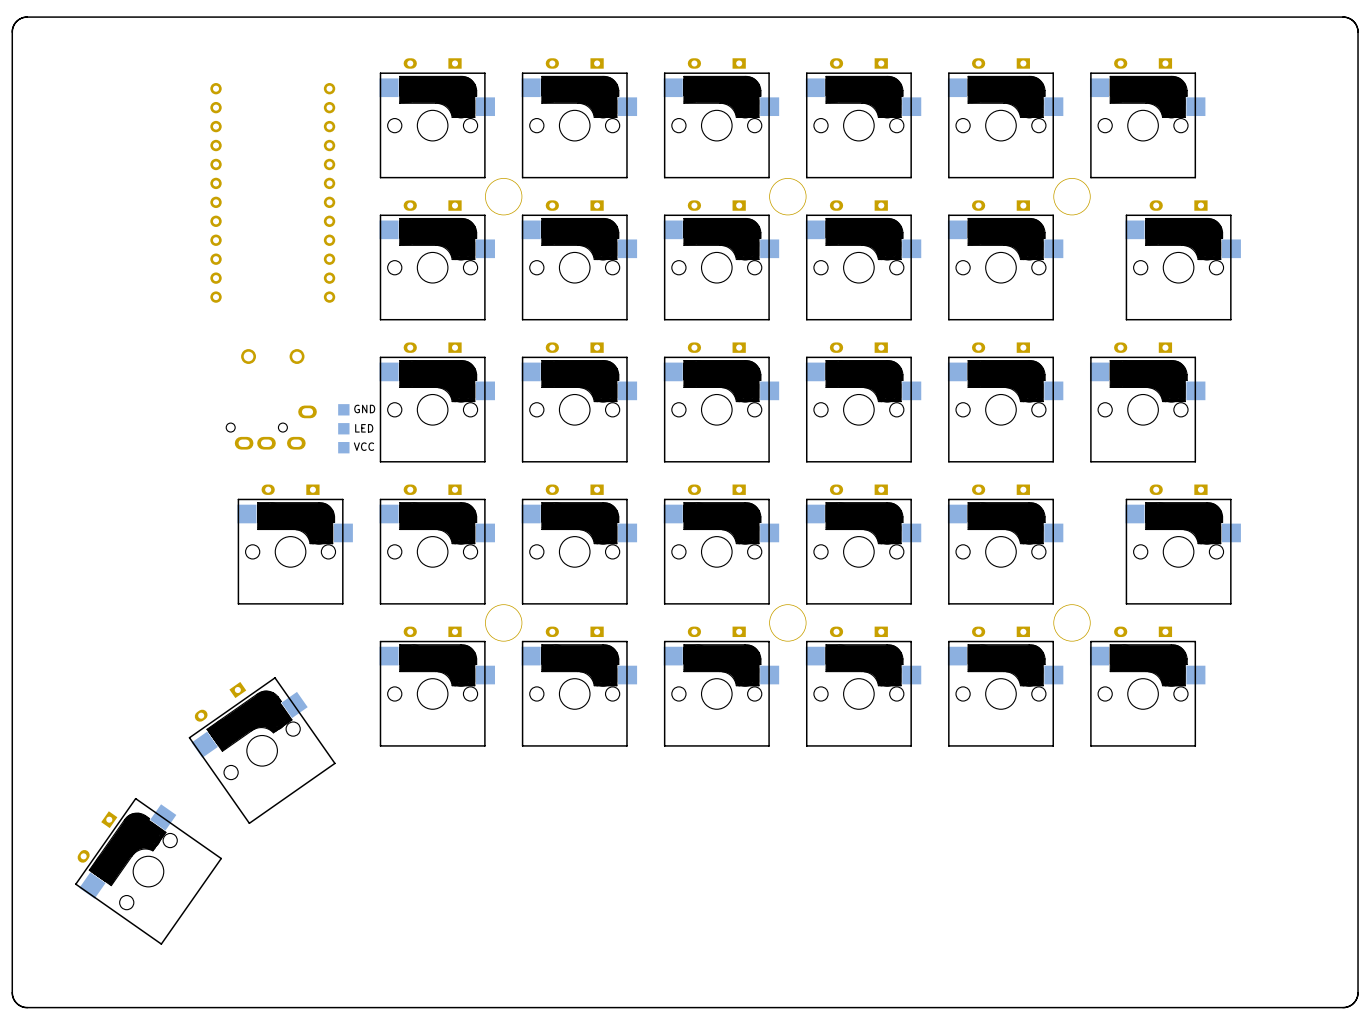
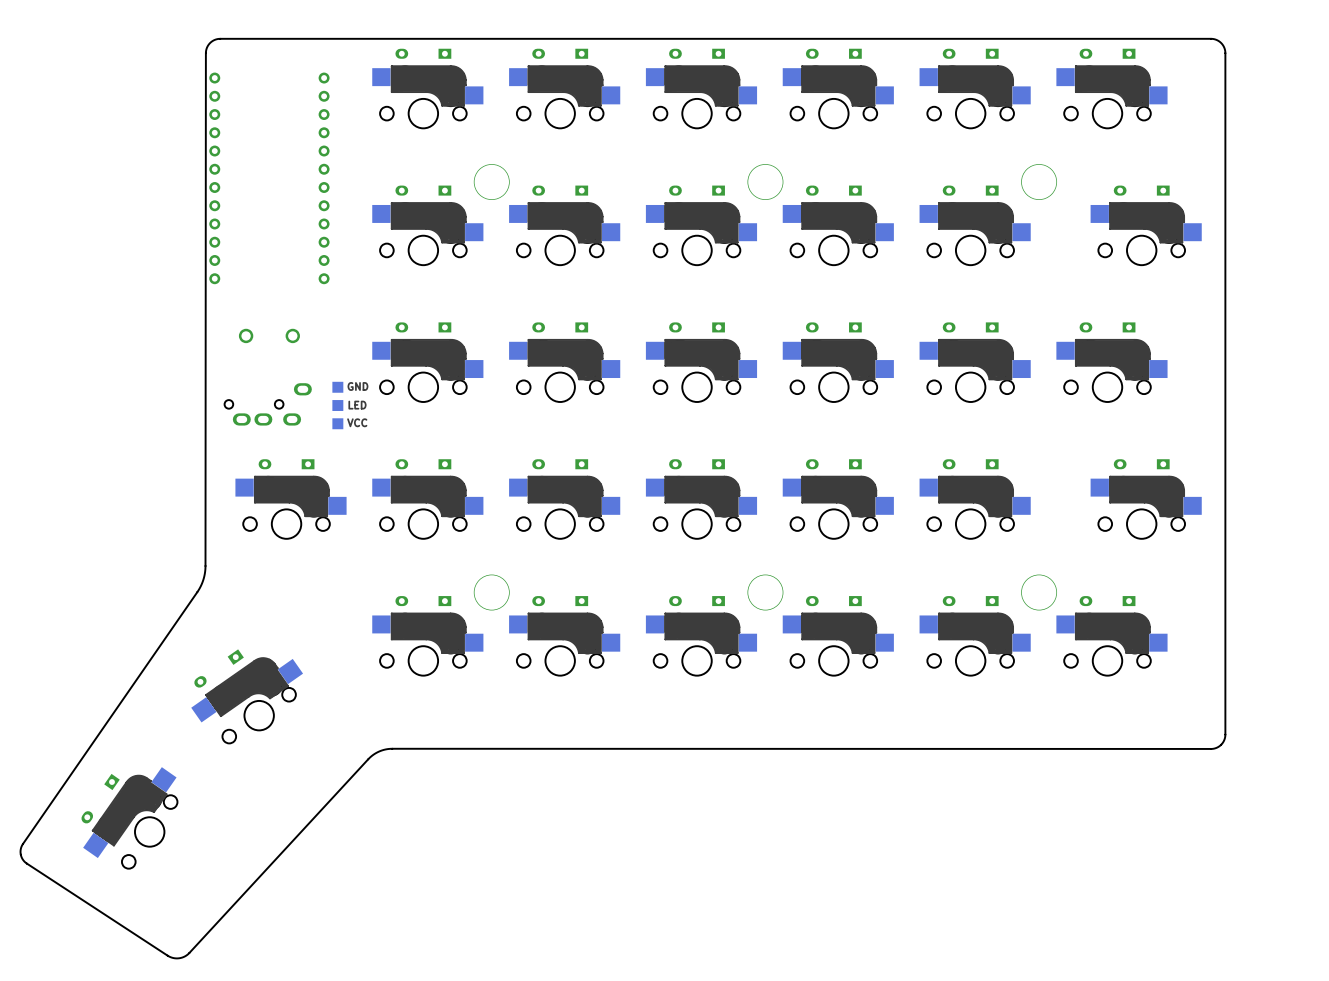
board edge: (1344, 17) (1353, 21) (1358, 32) (1358, 992) (1356, 999) (1351, 1004) (1343, 1007) (27, 1007) (20, 1005) (15, 1001) (12, 992) (12, 32) (13, 25) (18, 19) (27, 17) (1344, 17) -> (1211, 38) (1221, 43) (1225, 53) (1225, 734) (1223, 741) (1218, 746) (1211, 748) (385, 749) (369, 758) (189, 952) (179, 958) (167, 955) (22, 859) (20, 852) (22, 844) (197, 592) (204, 576) (205, 53) (207, 46) (212, 41) (220, 38) (1211, 38)
board edge: (484, 73) (484, 177) (380, 177) (380, 73) (484, 73) -> none
board edge: (626, 73) (626, 177) (522, 177) (522, 73) (626, 73) -> none
board edge: (769, 73) (769, 177) (664, 177) (664, 73) (769, 73) -> none
board edge: (911, 73) (911, 177) (806, 177) (806, 73) (911, 73) -> none
board edge: (1053, 73) (1053, 177) (948, 177) (948, 73) (1053, 73) -> none
board edge: (1195, 73) (1195, 177) (1090, 177) (1090, 73) (1195, 73) -> none
board edge: (484, 215) (484, 319) (380, 319) (380, 215) (484, 215) -> none
board edge: (626, 215) (626, 319) (522, 319) (522, 215) (626, 215) -> none
board edge: (769, 215) (769, 319) (664, 319) (664, 215) (769, 215) -> none
board edge: (911, 215) (911, 319) (806, 319) (806, 215) (911, 215) -> none
board edge: (1053, 215) (1053, 319) (948, 319) (948, 215) (1053, 215) -> none
board edge: (1230, 215) (1126, 215) (1126, 319) (1230, 319) (1230, 215) -> none
board edge: (484, 357) (484, 461) (380, 461) (380, 357) (484, 357) -> none
board edge: (626, 357) (626, 461) (522, 461) (522, 357) (626, 357) -> none
board edge: (769, 357) (769, 461) (664, 461) (664, 357) (769, 357) -> none
board edge: (911, 357) (911, 461) (806, 461) (806, 357) (911, 357) -> none
board edge: (1053, 357) (1053, 461) (948, 461) (948, 357) (1053, 357) -> none
board edge: (1195, 357) (1195, 461) (1090, 461) (1090, 357) (1195, 357) -> none
board edge: (342, 499) (238, 499) (238, 603) (342, 603) (342, 499) -> none
board edge: (484, 499) (380, 499) (380, 603) (484, 603) (484, 499) -> none
board edge: (626, 499) (522, 499) (522, 603) (626, 603) (626, 499) -> none
board edge: (769, 499) (664, 499) (664, 603) (769, 603) (769, 499) -> none
board edge: (911, 499) (806, 499) (806, 603) (911, 603) (911, 499) -> none
board edge: (1053, 499) (1053, 603) (948, 603) (948, 499) (1053, 499) -> none
board edge: (1230, 499) (1126, 499) (1126, 603) (1230, 603) (1230, 499) -> none
board edge: (484, 641) (380, 641) (380, 745) (484, 745) (484, 641) -> none
board edge: (626, 641) (522, 641) (522, 745) (626, 745) (626, 641) -> none
board edge: (769, 641) (769, 745) (664, 745) (664, 641) (769, 641) -> none
board edge: (911, 641) (911, 745) (806, 745) (806, 641) (911, 641) -> none
board edge: (1053, 641) (1053, 745) (948, 745) (948, 641) (1053, 641) -> none
board edge: (1195, 641) (1090, 641) (1090, 745) (1195, 745) (1195, 641) -> none
board edge: (275, 677) (189, 737) (249, 823) (334, 763) (275, 677) -> none
board edge: (135, 798) (75, 884) (161, 944) (221, 858) (135, 798) -> none

